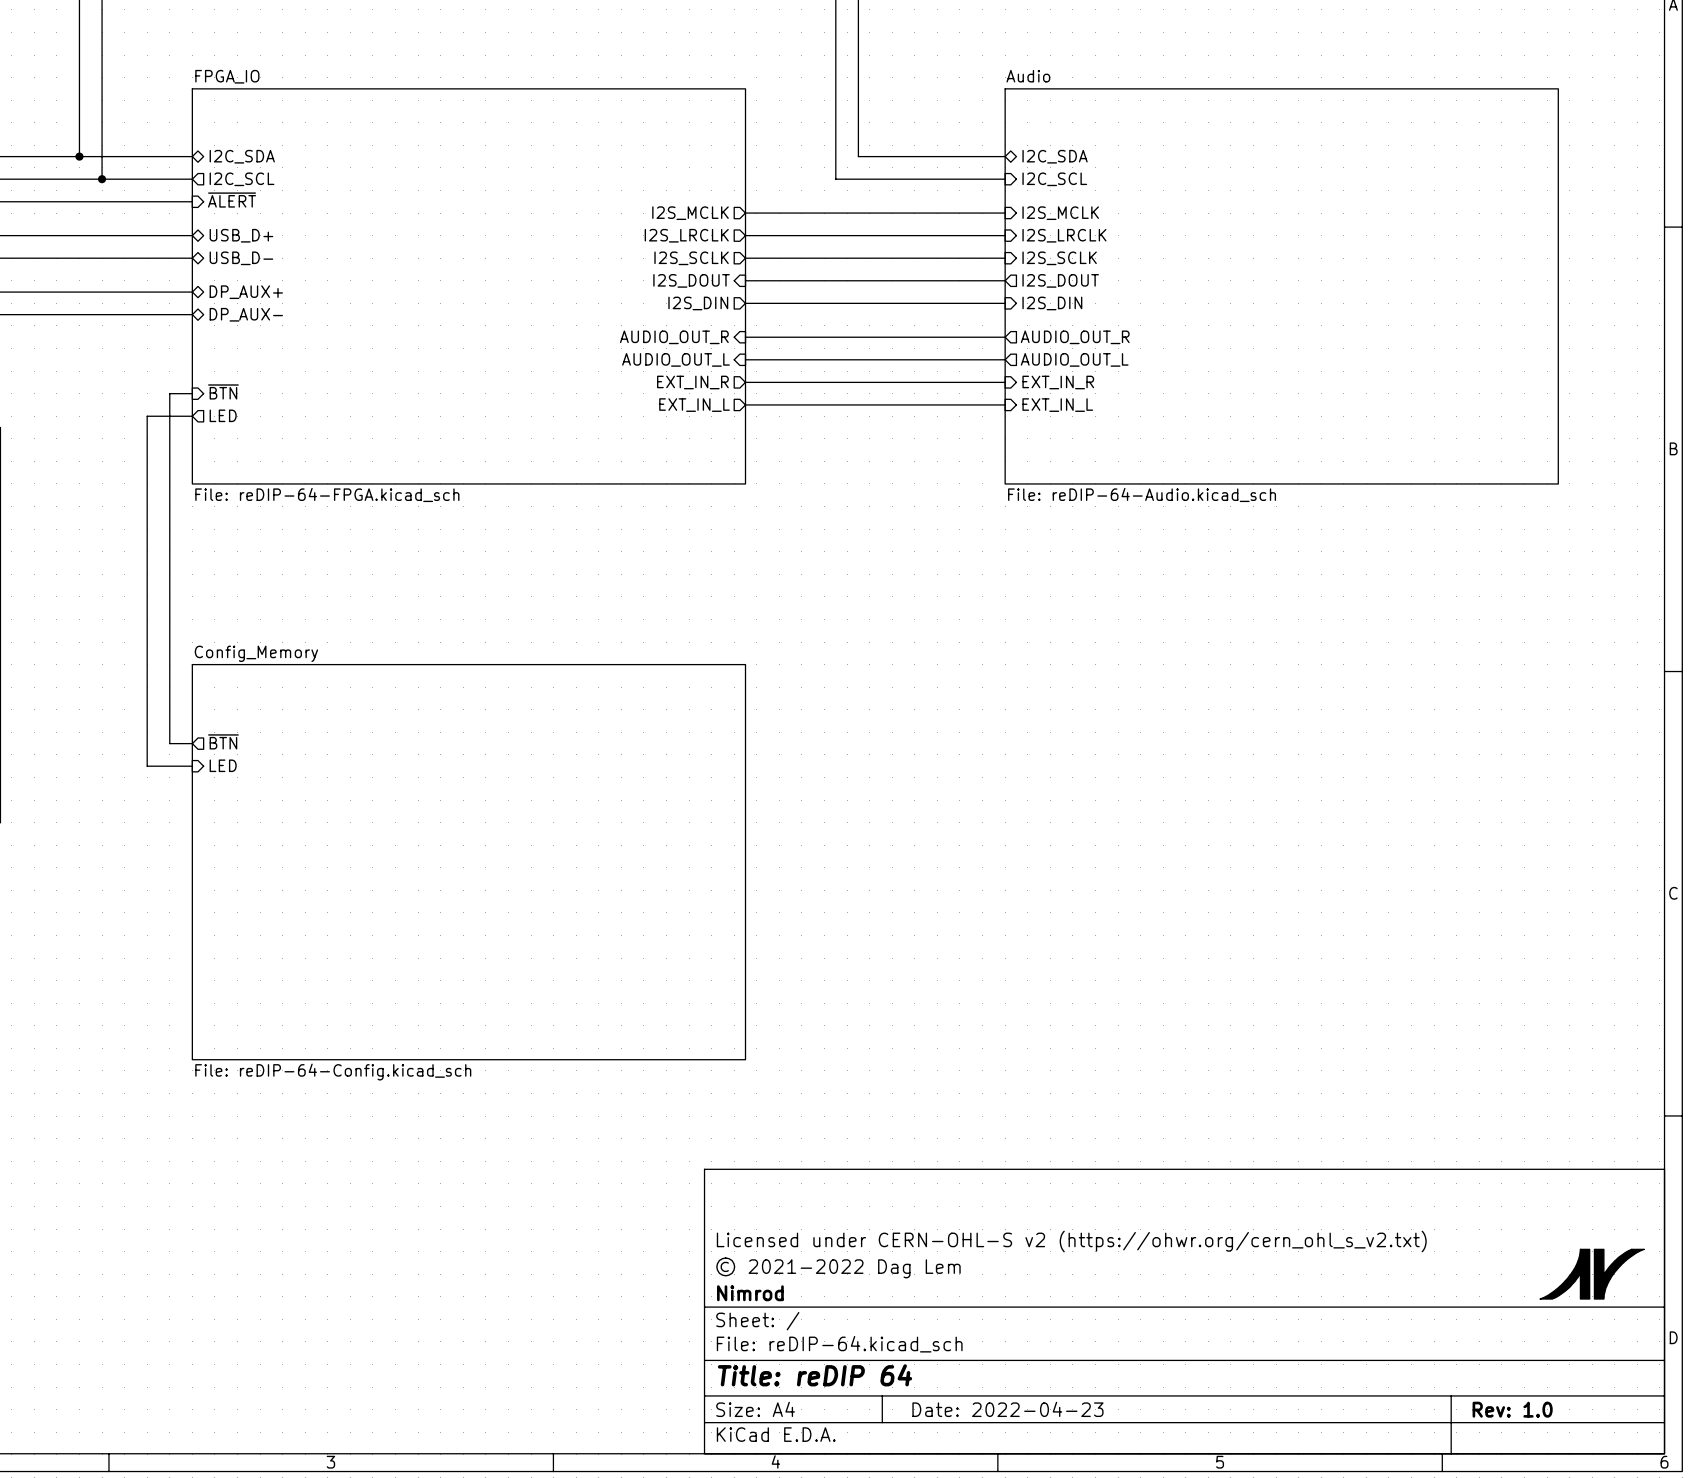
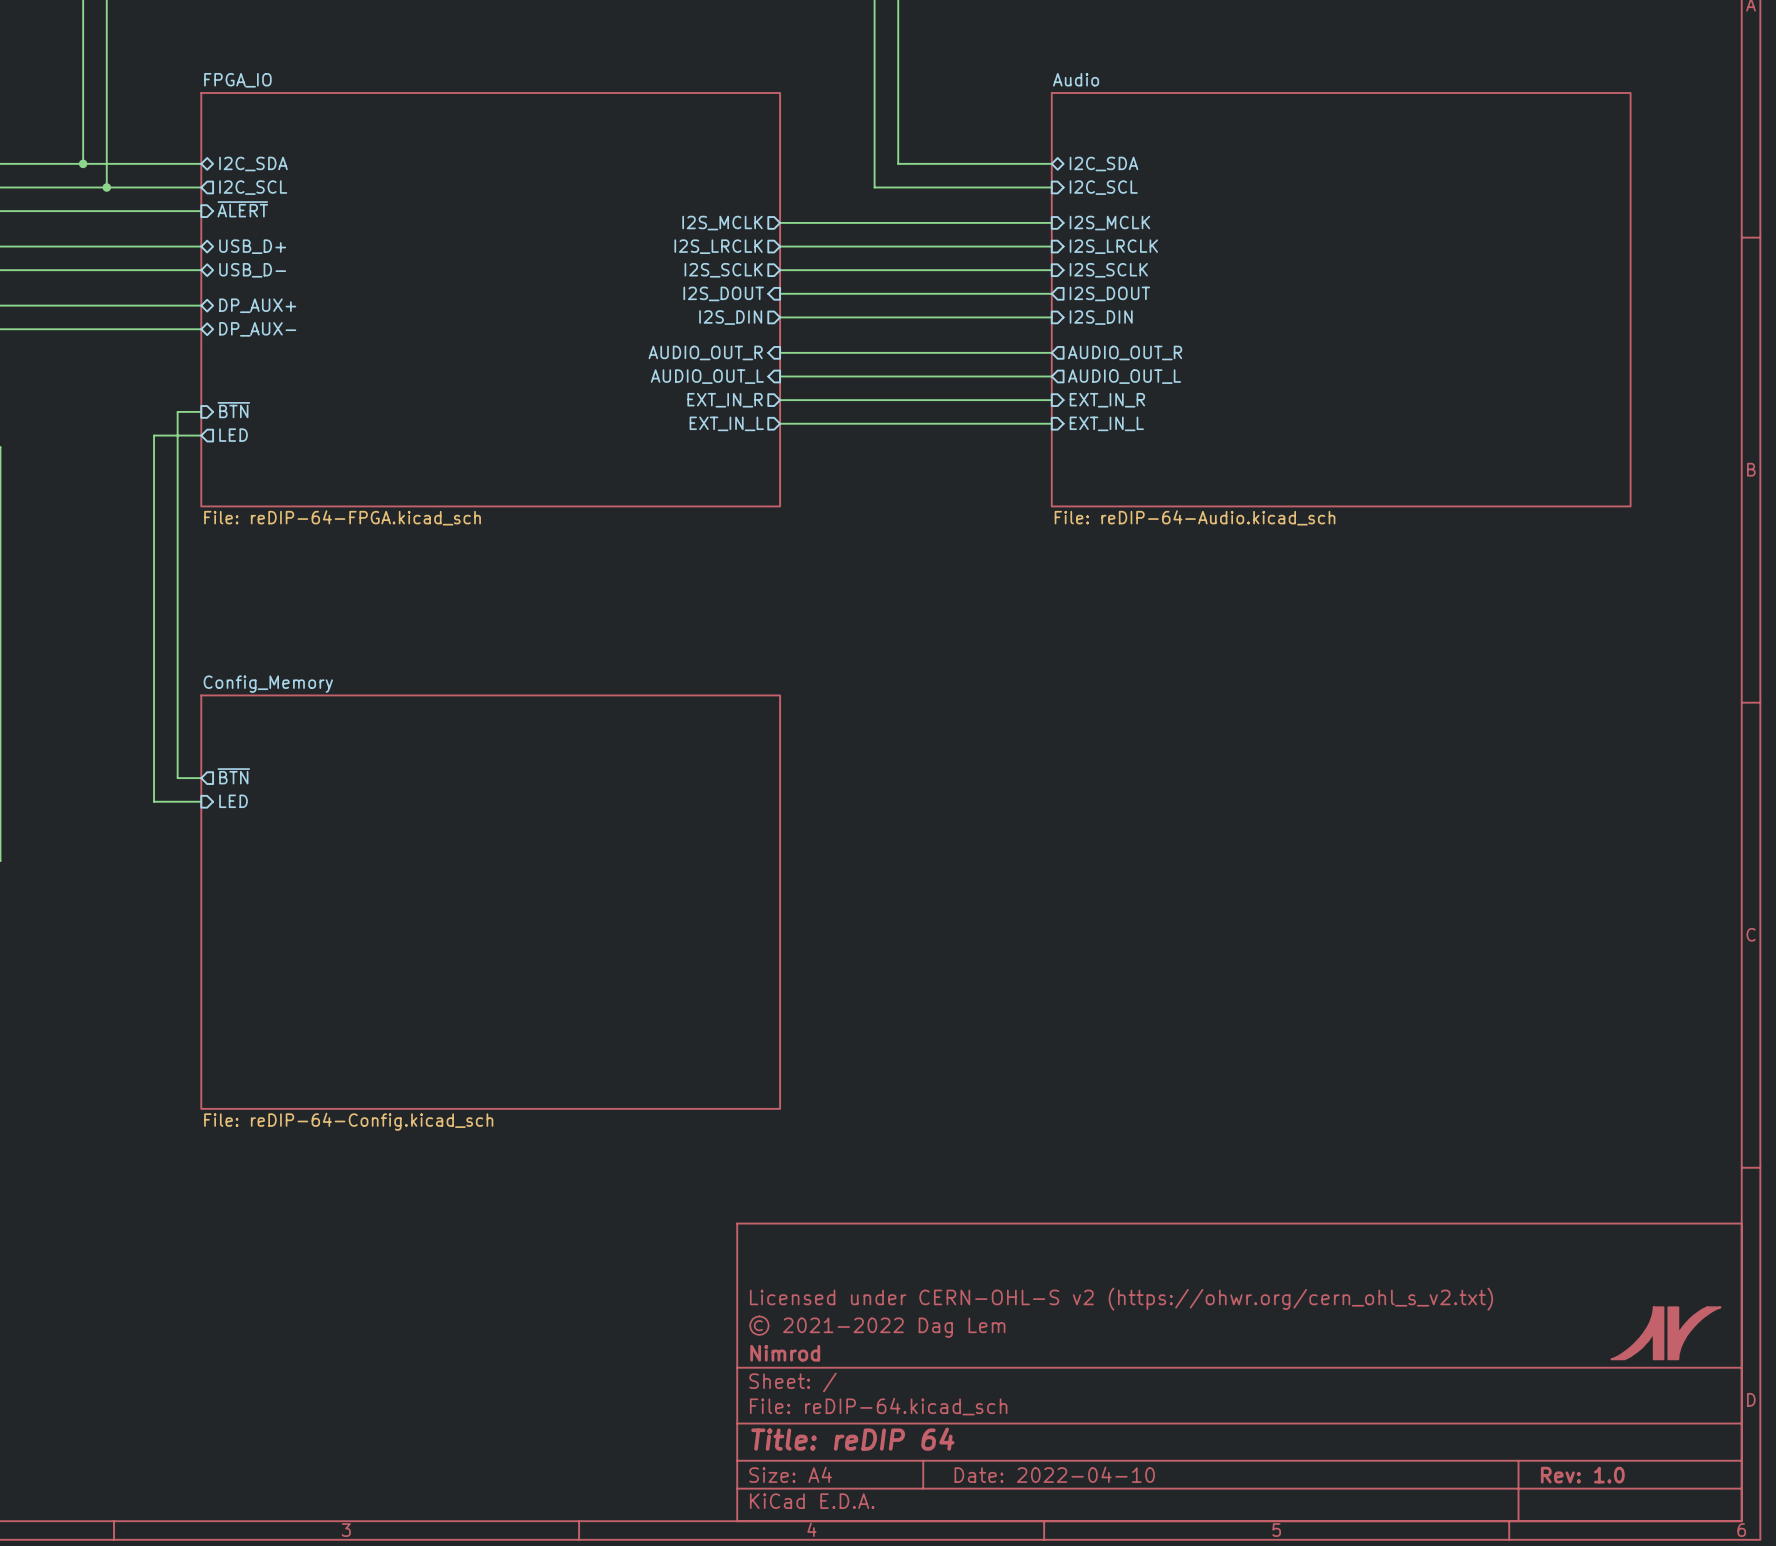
title block: Date: 2022-04-23 (1007, 1409) -> Date: 2022-04-10 (1054, 1474)

